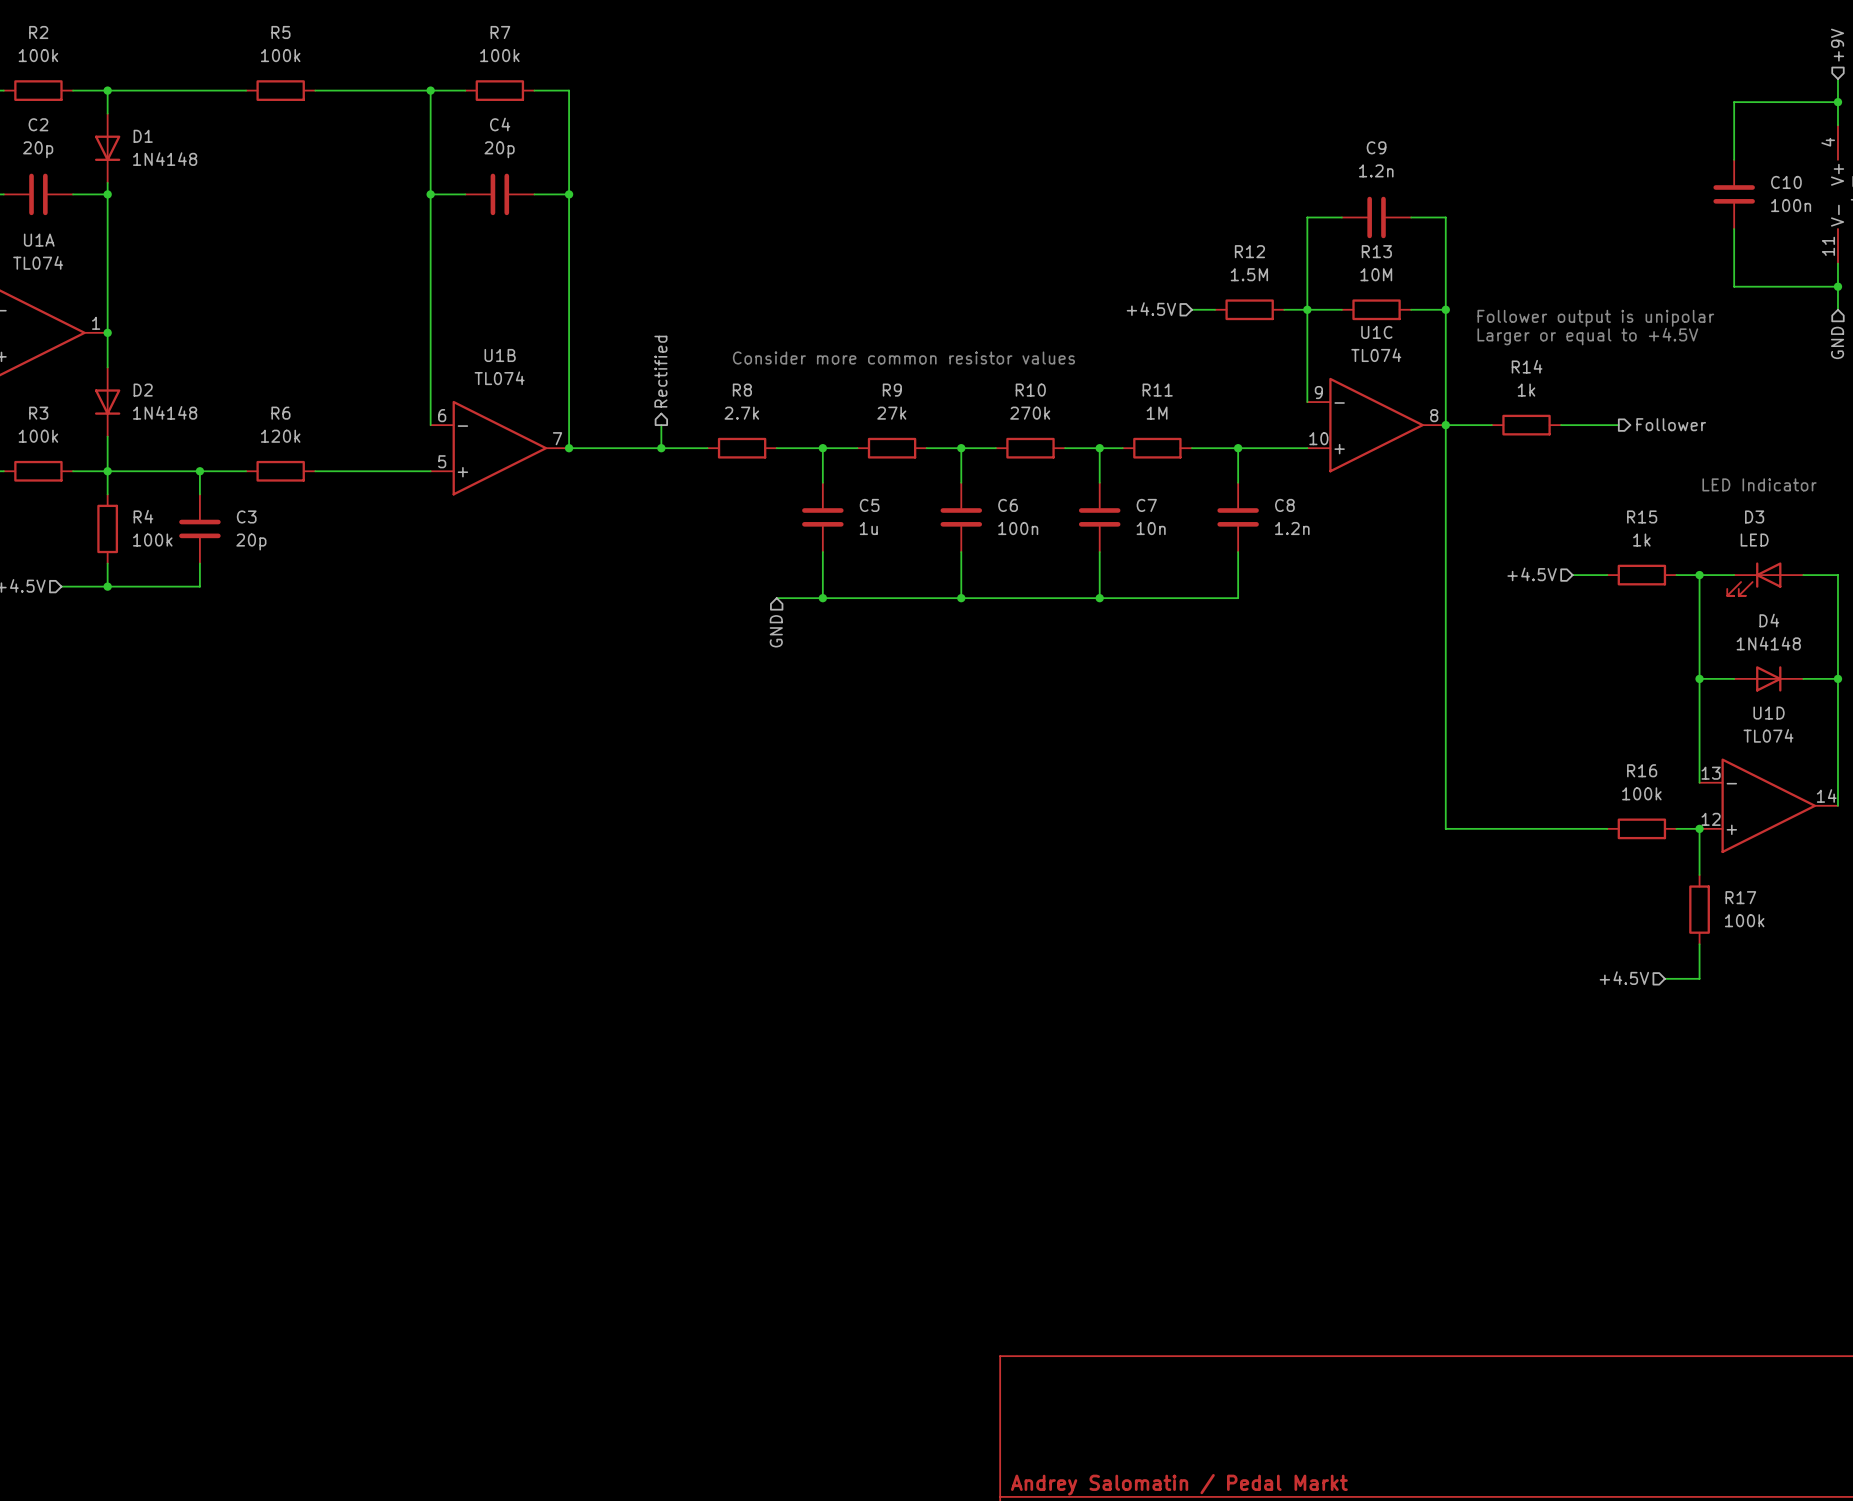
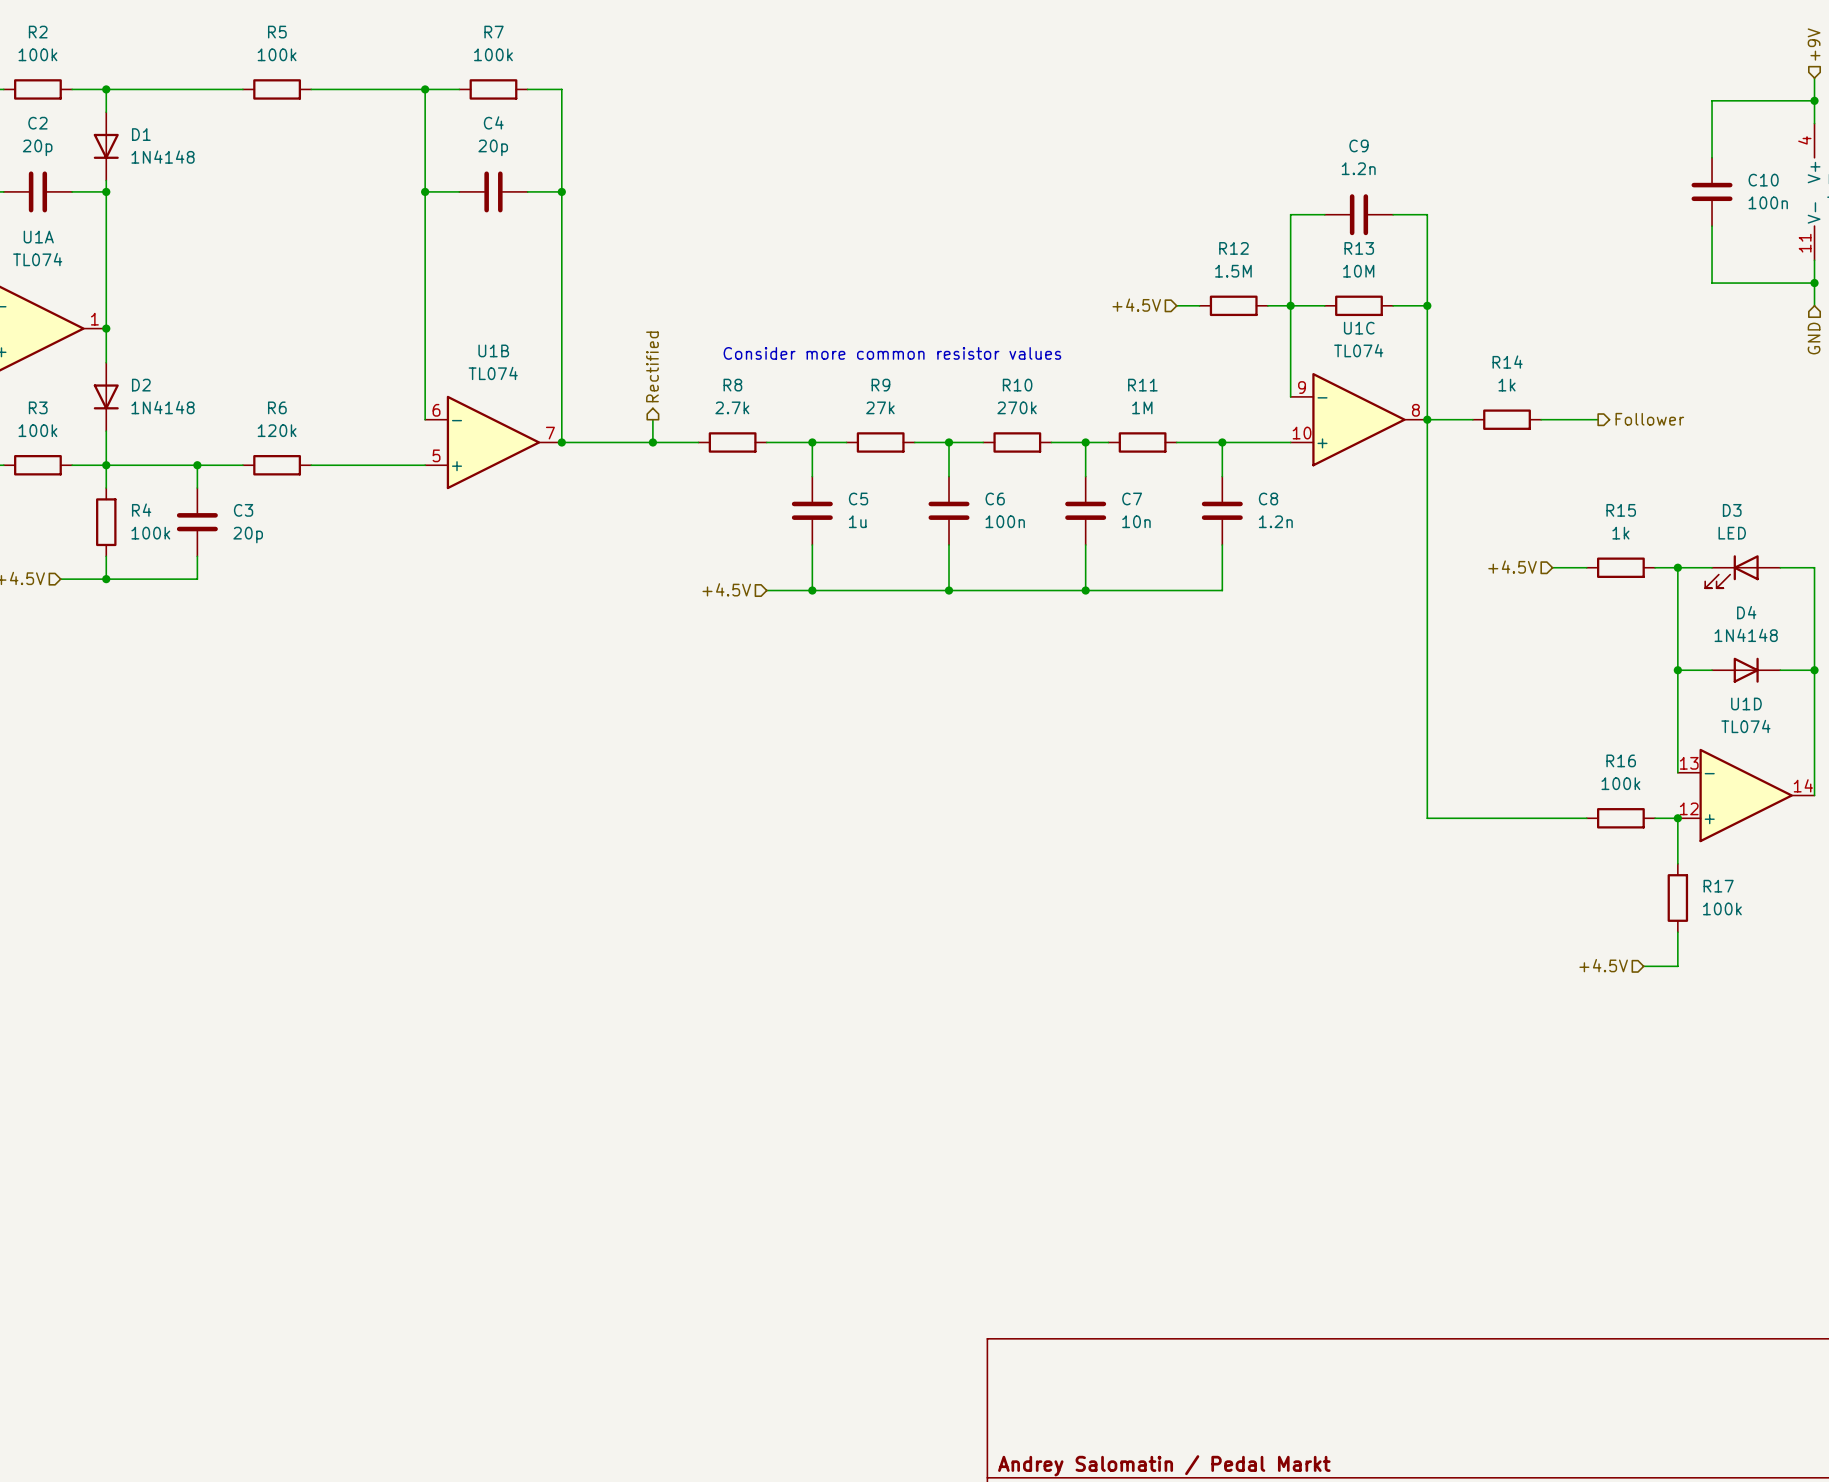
text: Follower output is unipolar (1595, 318) -> none
text: Larger or equal to +4.5V (1587, 336) -> none
text: LED Indicator (1759, 484) -> none
hierarchical label: none -> +4.5V (726, 589)
hierarchical label: GND (776, 631) -> none

